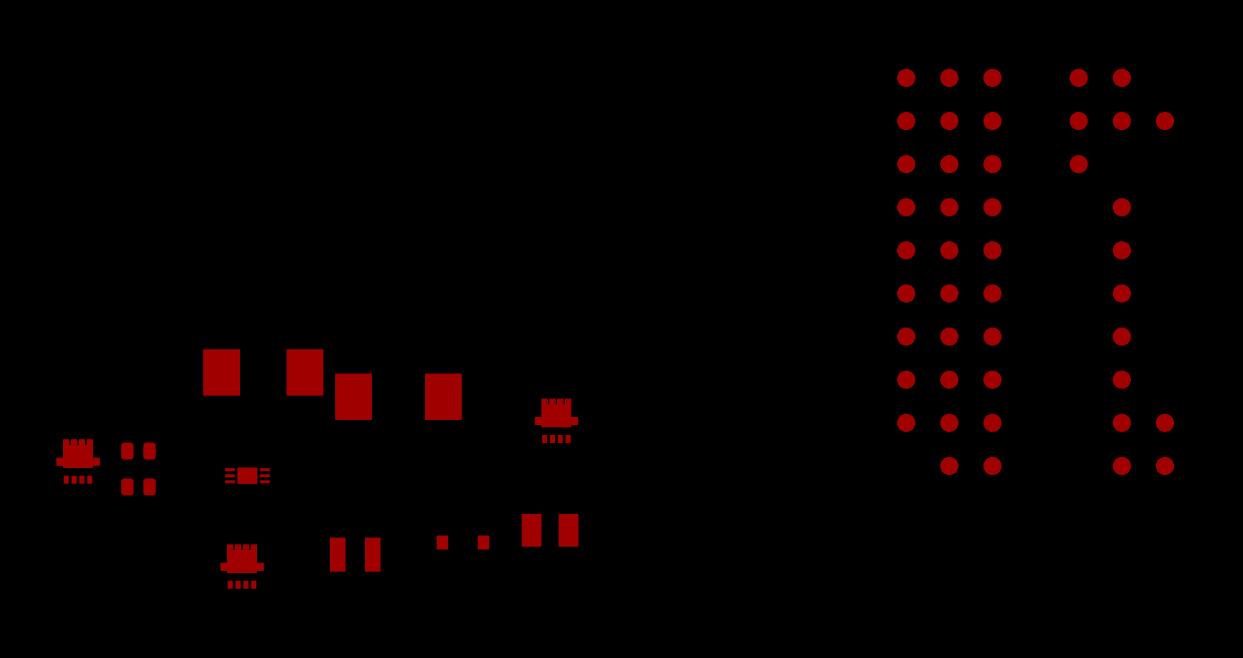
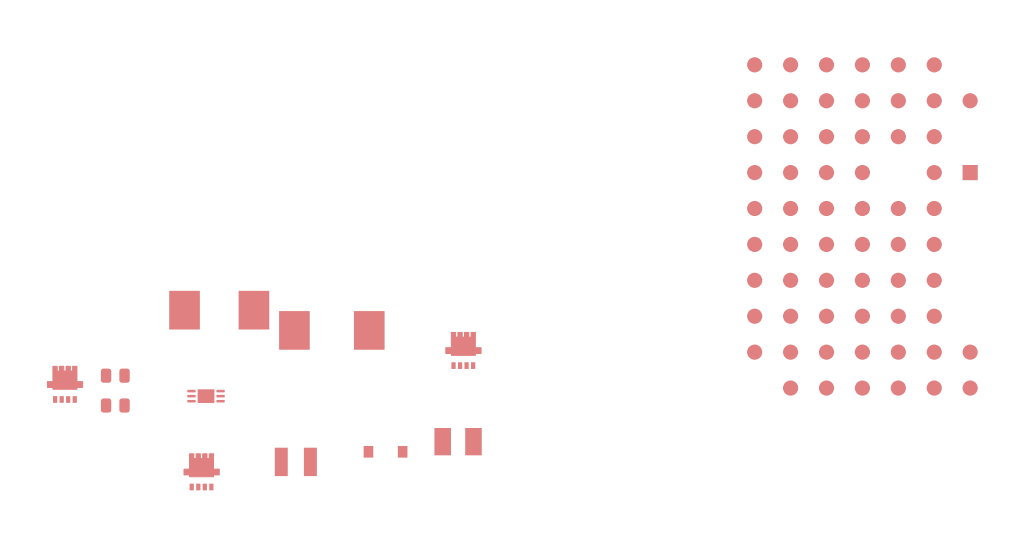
part: none -> (862, 64)
part: none -> (862, 100)
part: none -> (862, 136)
part: none -> (934, 136)
part: none -> (862, 172)
part: none -> (970, 172)
part: none -> (862, 208)
part: none -> (898, 208)
part: none -> (862, 244)
part: none -> (898, 244)
part: none -> (862, 280)
part: none -> (898, 280)
part: none -> (862, 316)
part: none -> (898, 316)
part: none -> (862, 352)
part: none -> (898, 352)
part: none -> (862, 388)
part: none -> (898, 388)

